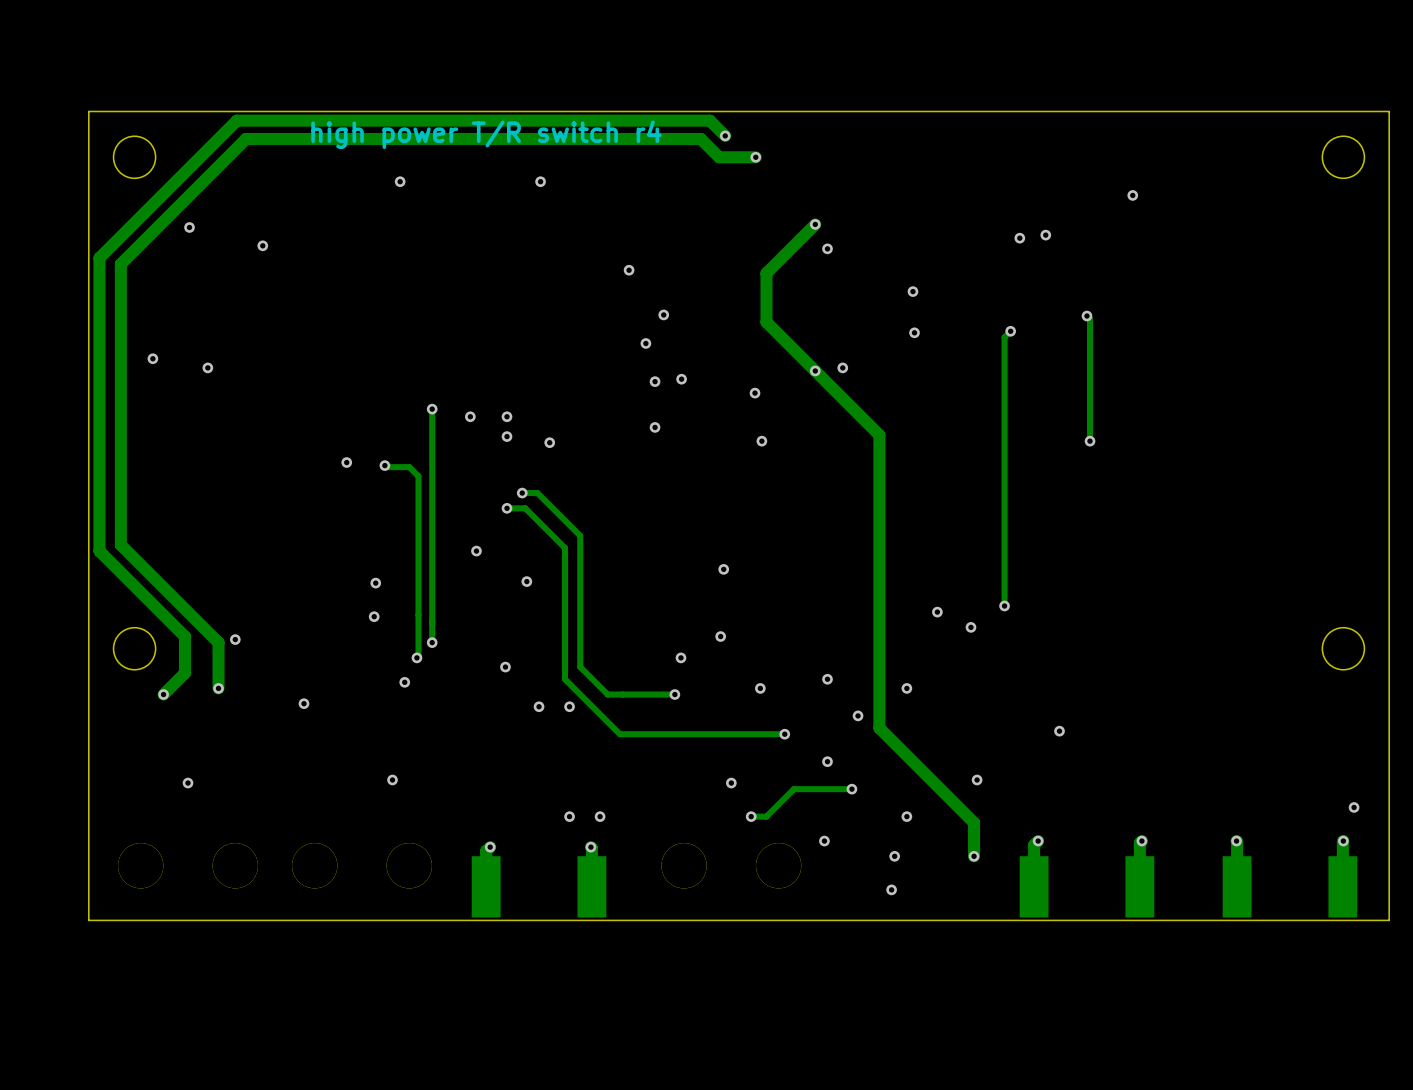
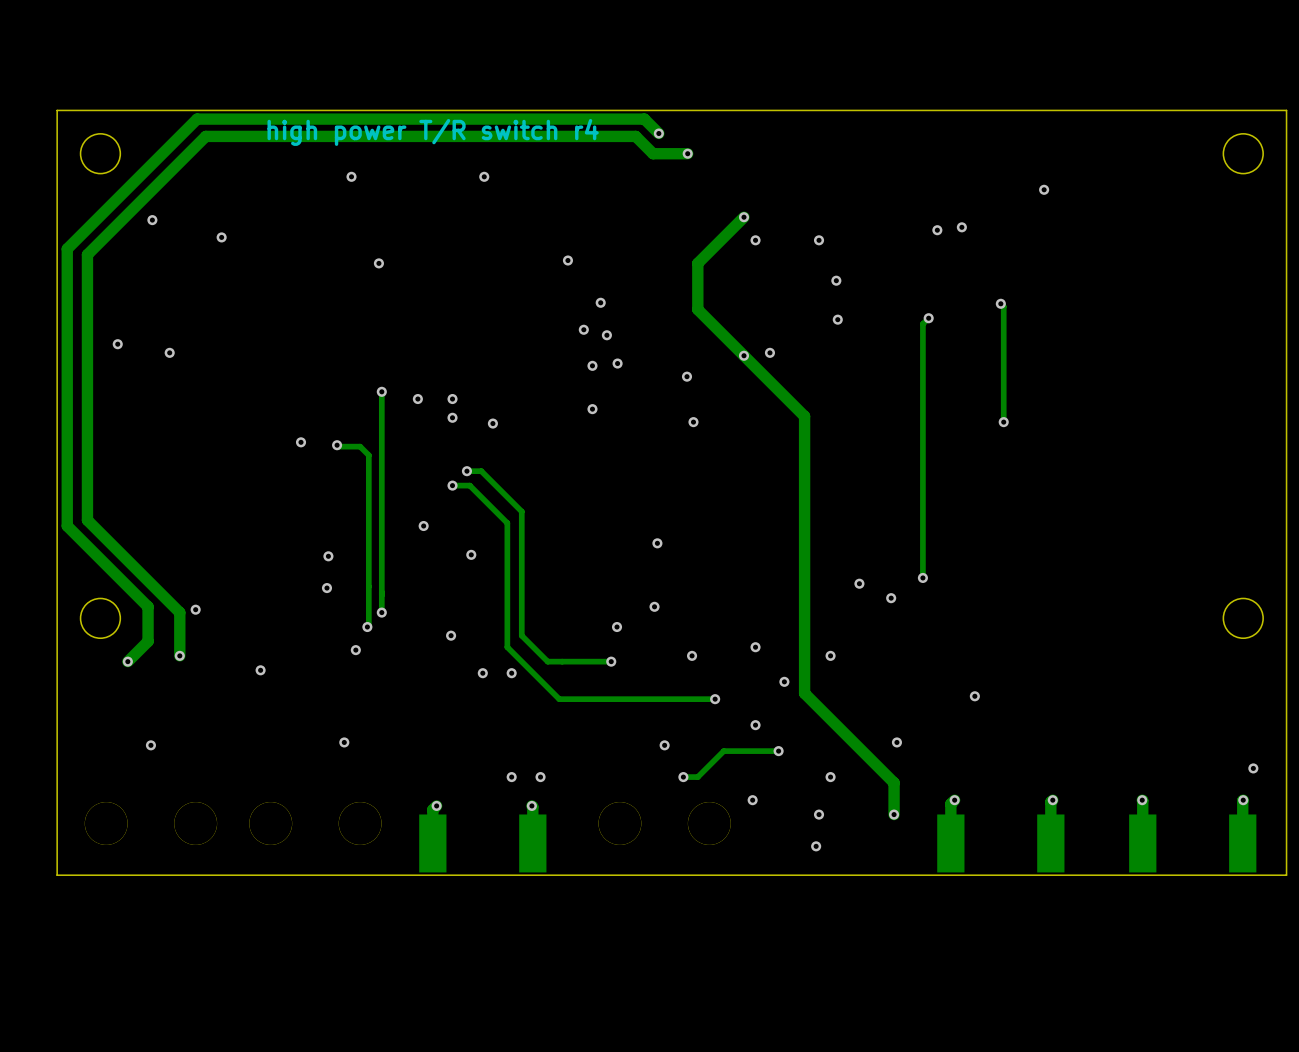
via: none -> (819, 240)
via: none -> (378, 263)
via: none -> (606, 335)

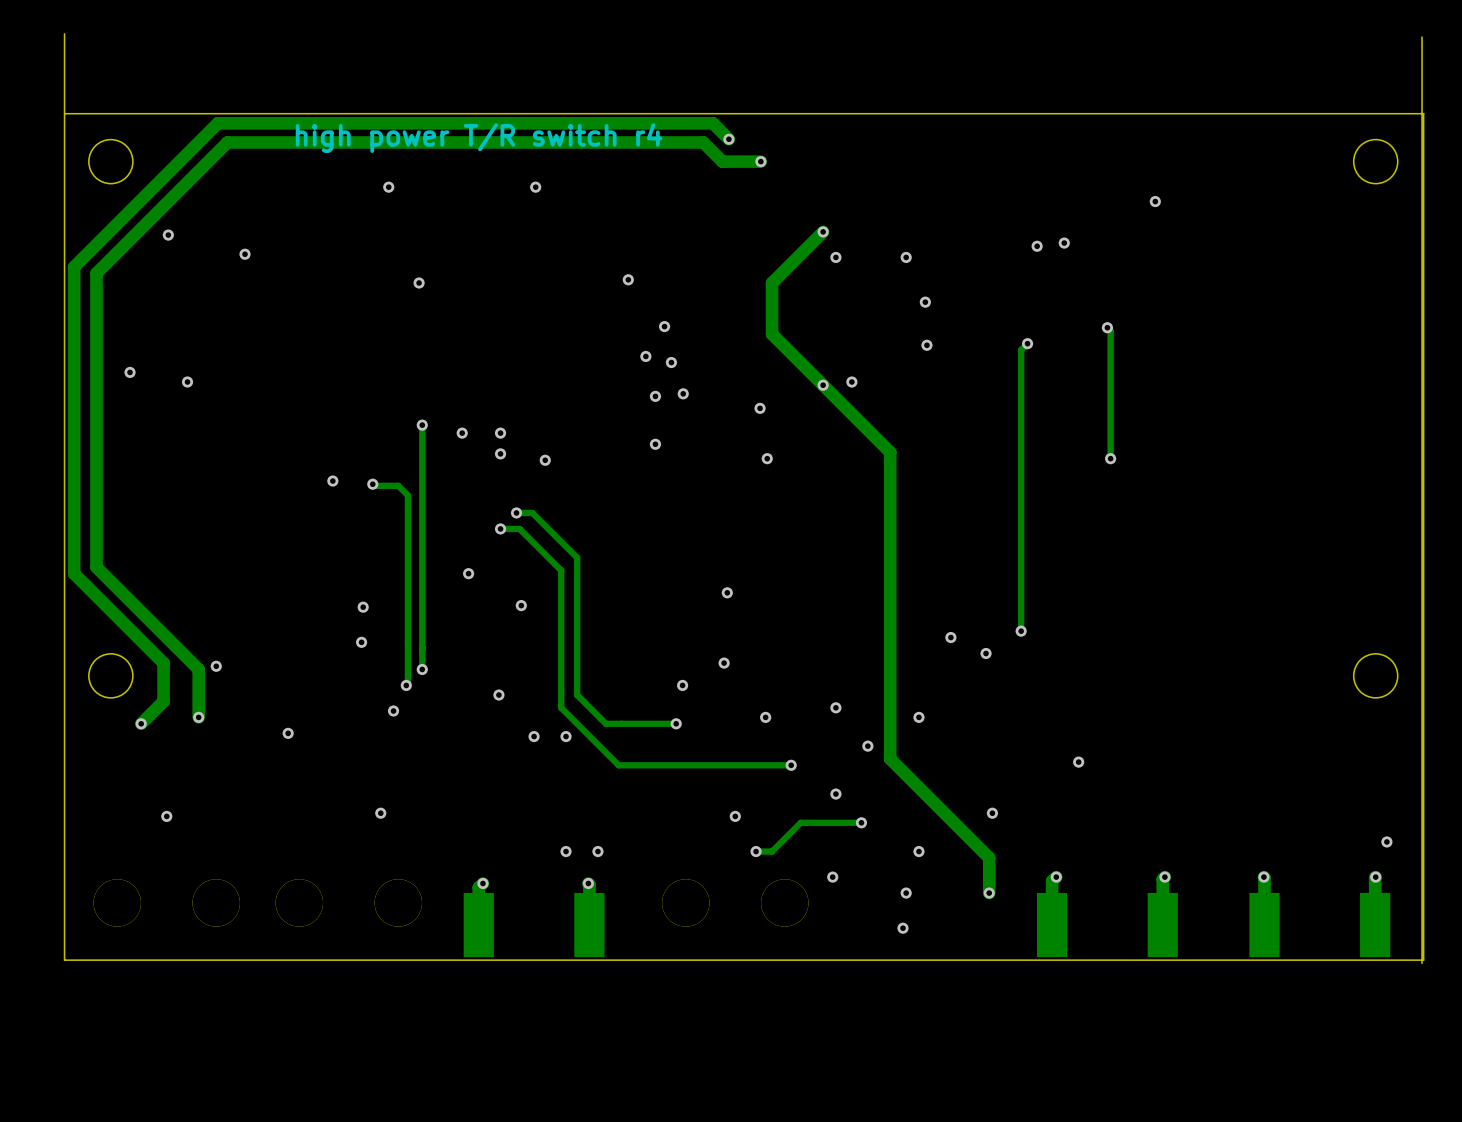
board edge: none -> (1422, 37) (1422, 963)
board edge: (58, 110) (58, 875) -> (64, 33) (64, 960)

